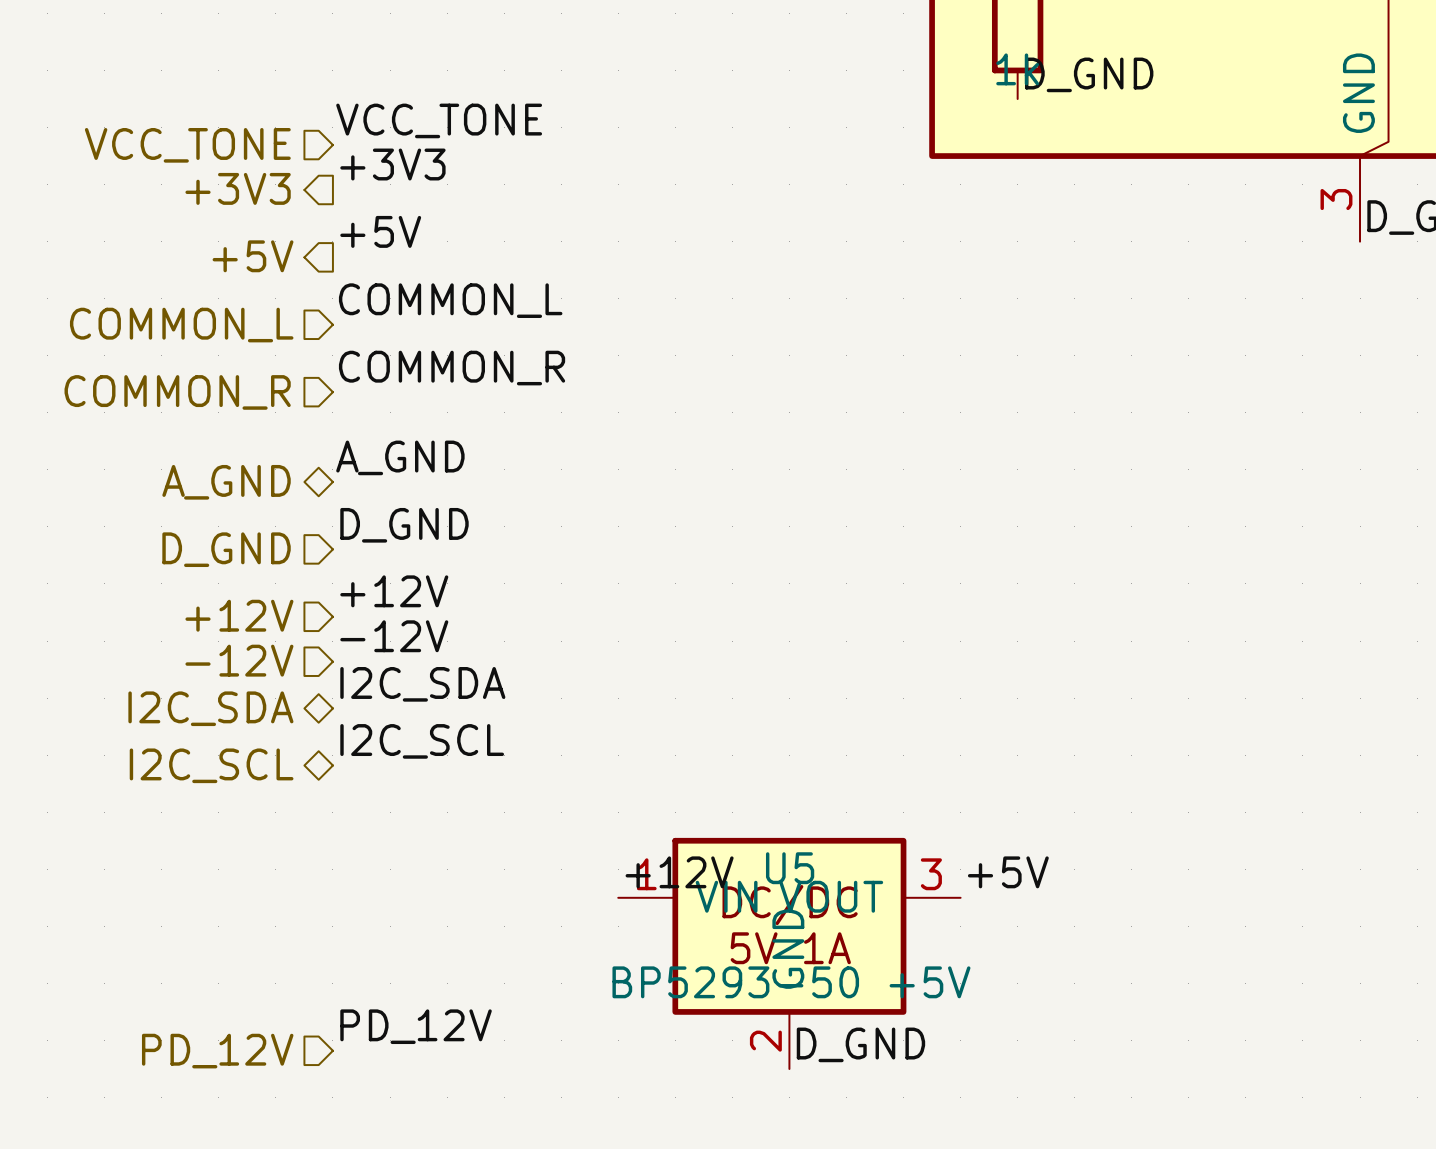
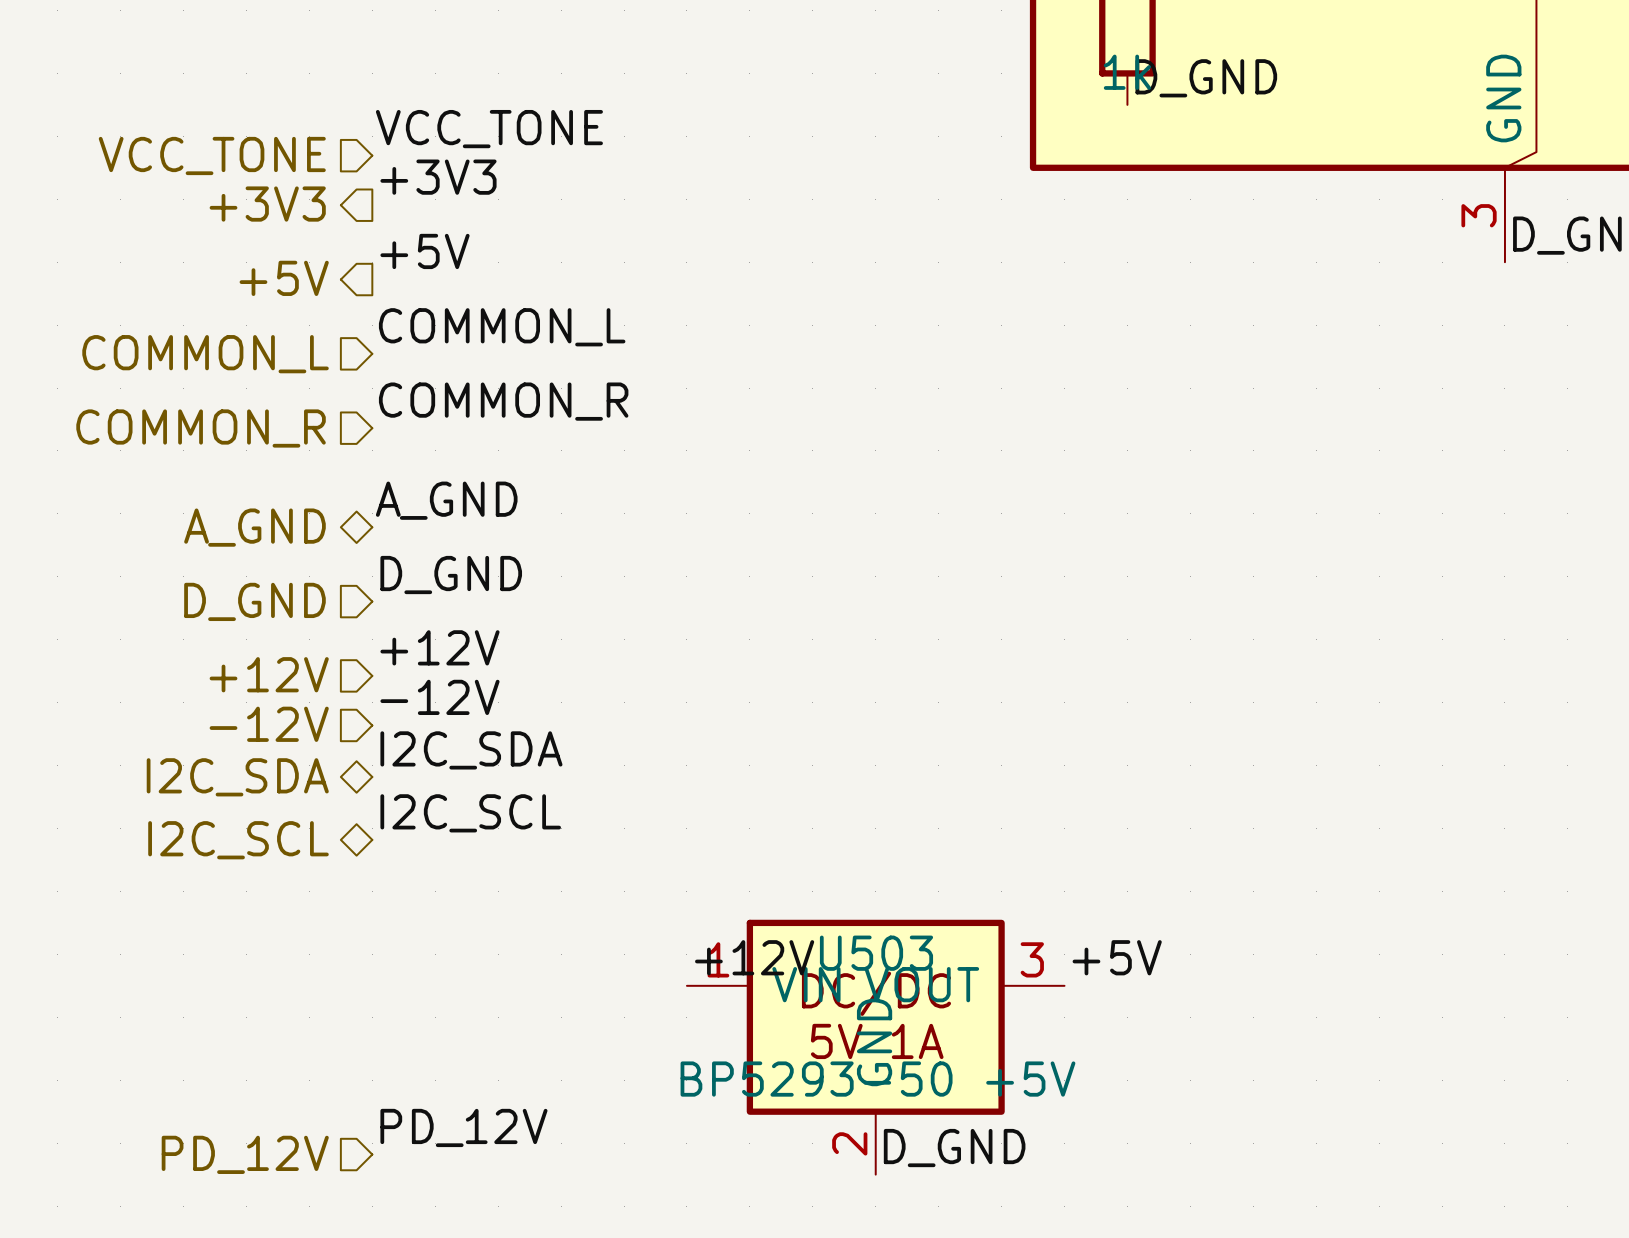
U5 name: U5 (790, 868) -> U503 (876, 953)

